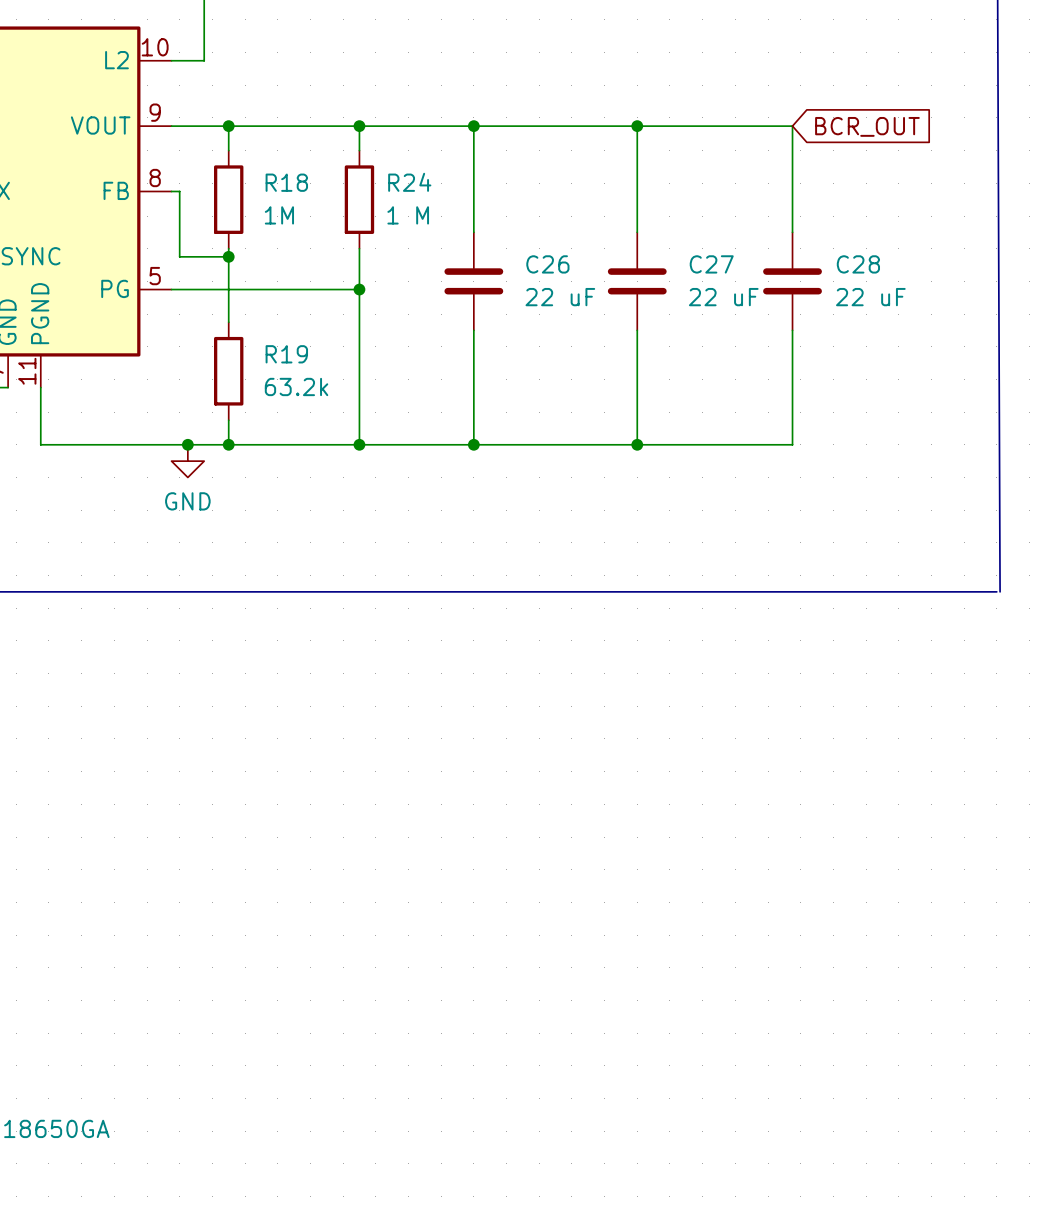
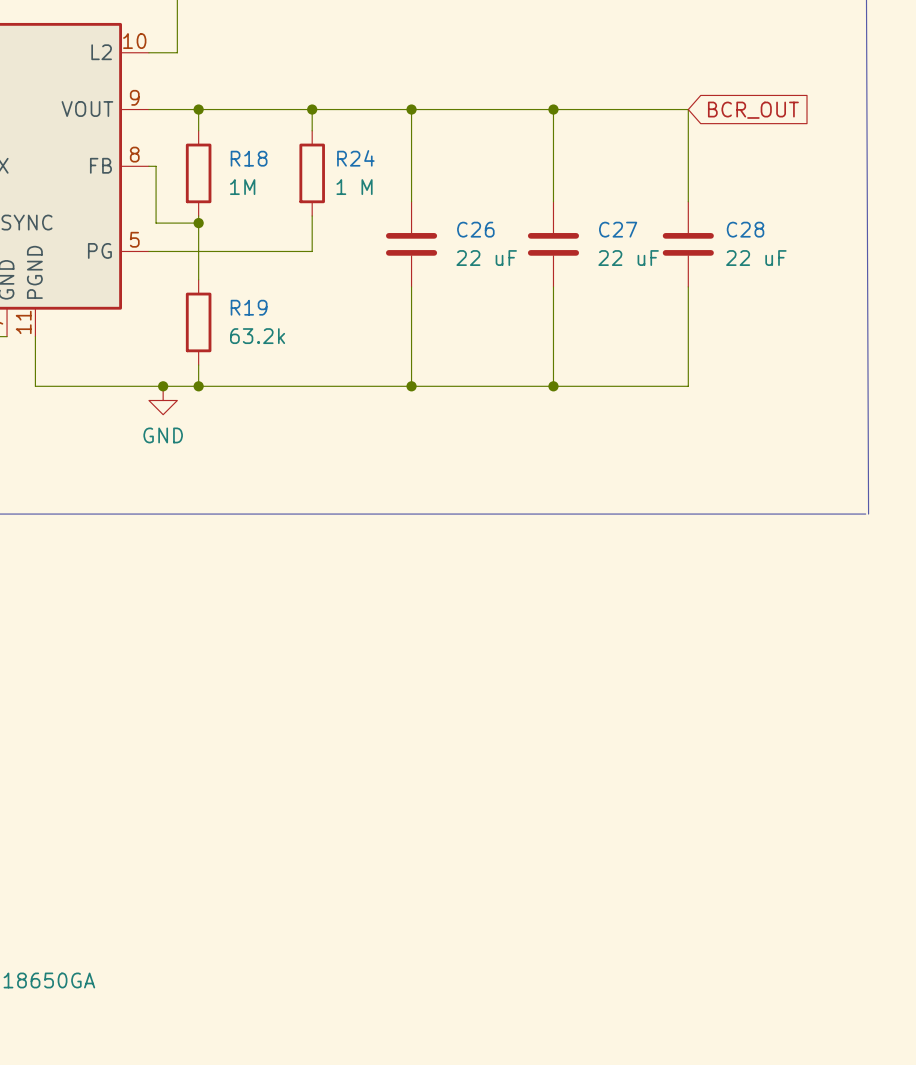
wire: (359, 289) (359, 444) -> none
junction: (359, 289) -> none
junction: (359, 444) -> none

